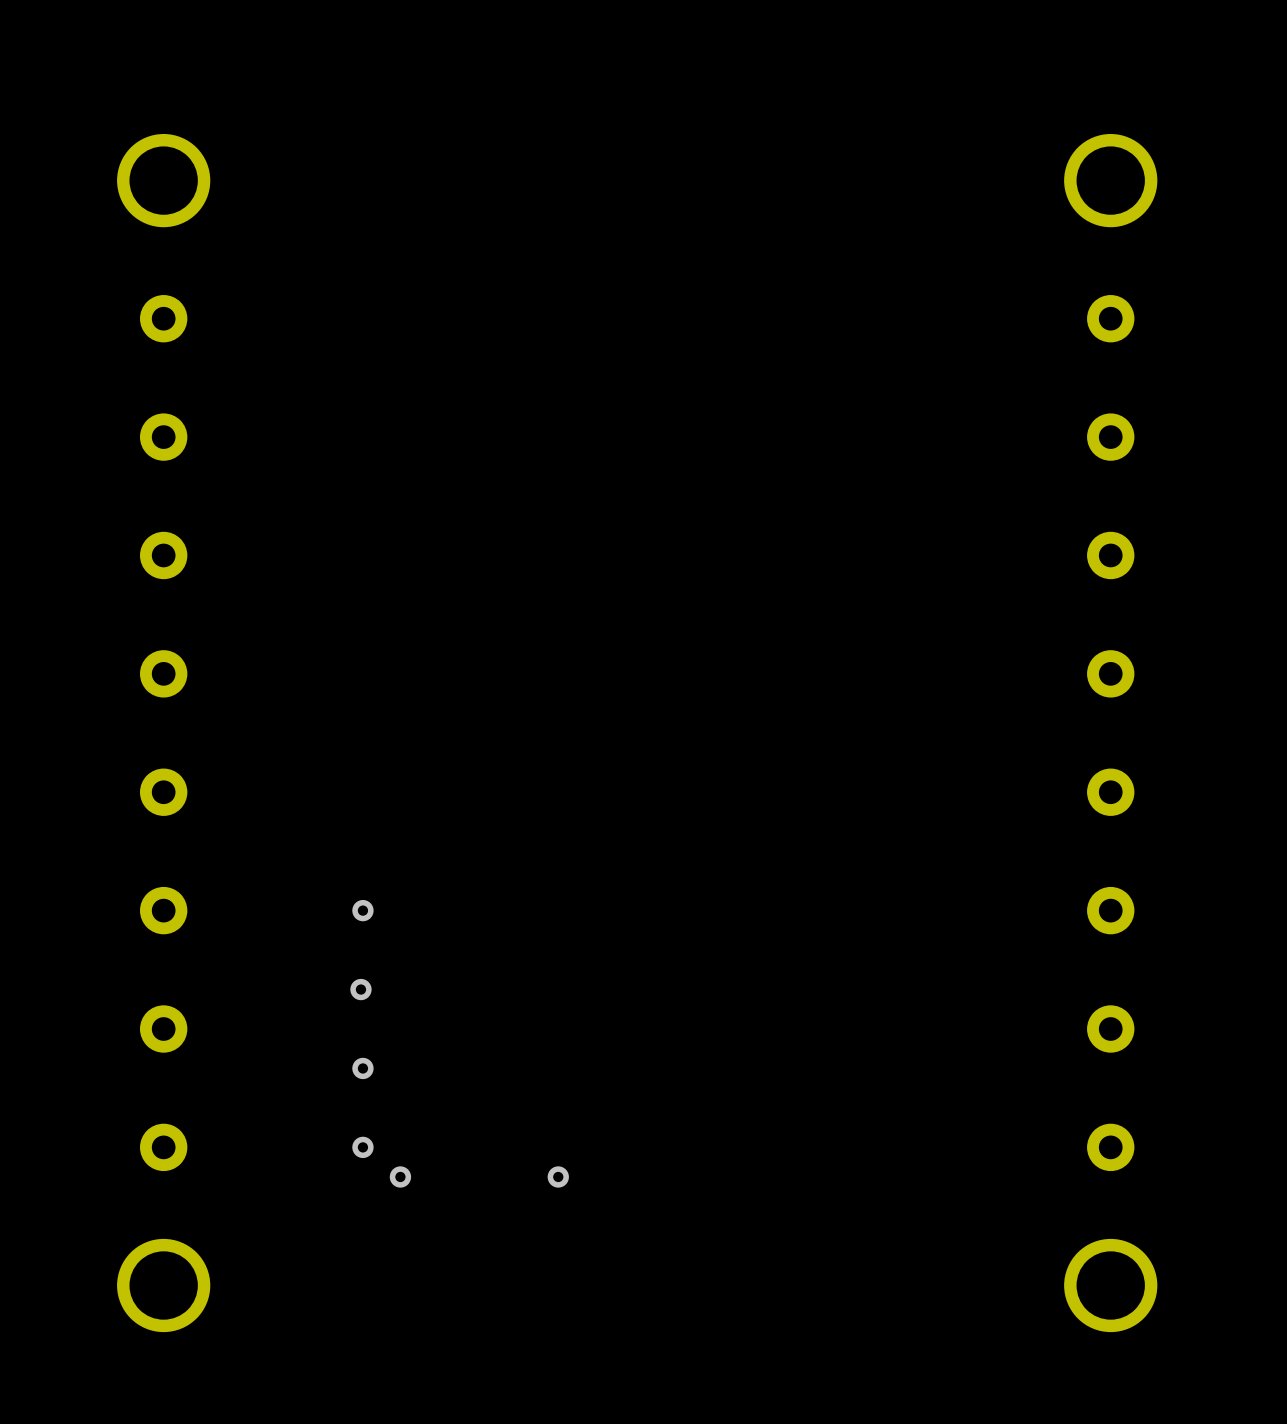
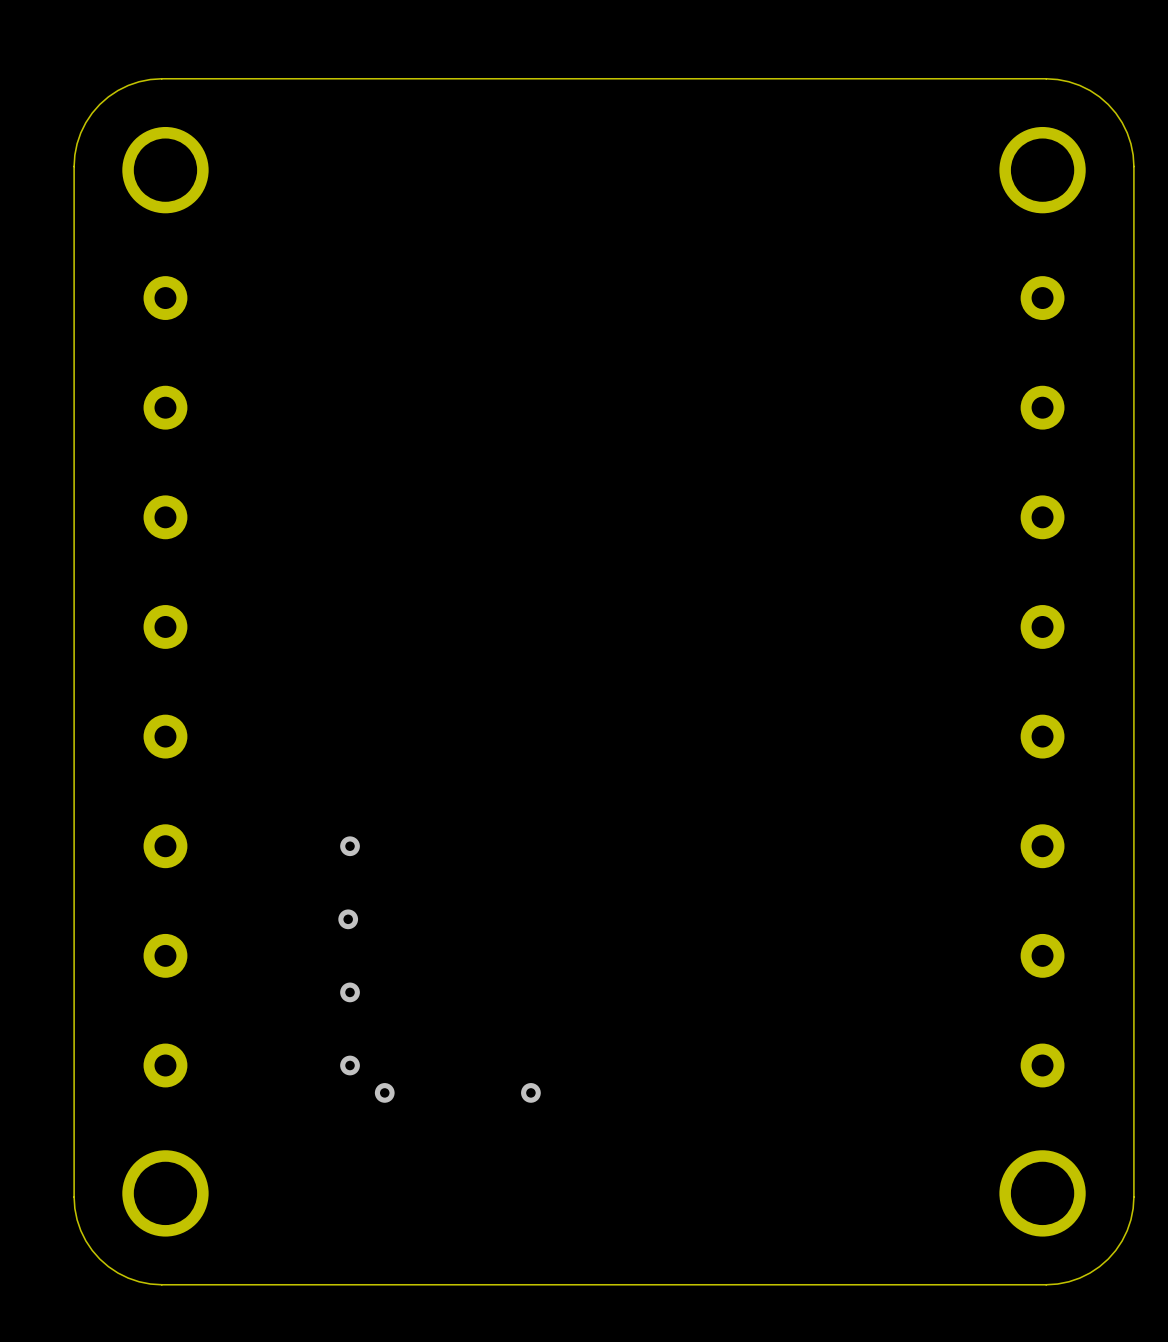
board edge: none -> (1046, 78) (161, 78) (128, 85) (108, 96) (92, 113) (77, 143) (74, 166) (74, 1197) (80, 1230) (92, 1250) (108, 1266) (128, 1278) (161, 1284) (1046, 1284) (1079, 1278) (1099, 1266) (1115, 1250) (1130, 1219) (1133, 1197) (1133, 166) (1127, 132) (1108, 104) (1079, 85) (1046, 78)

